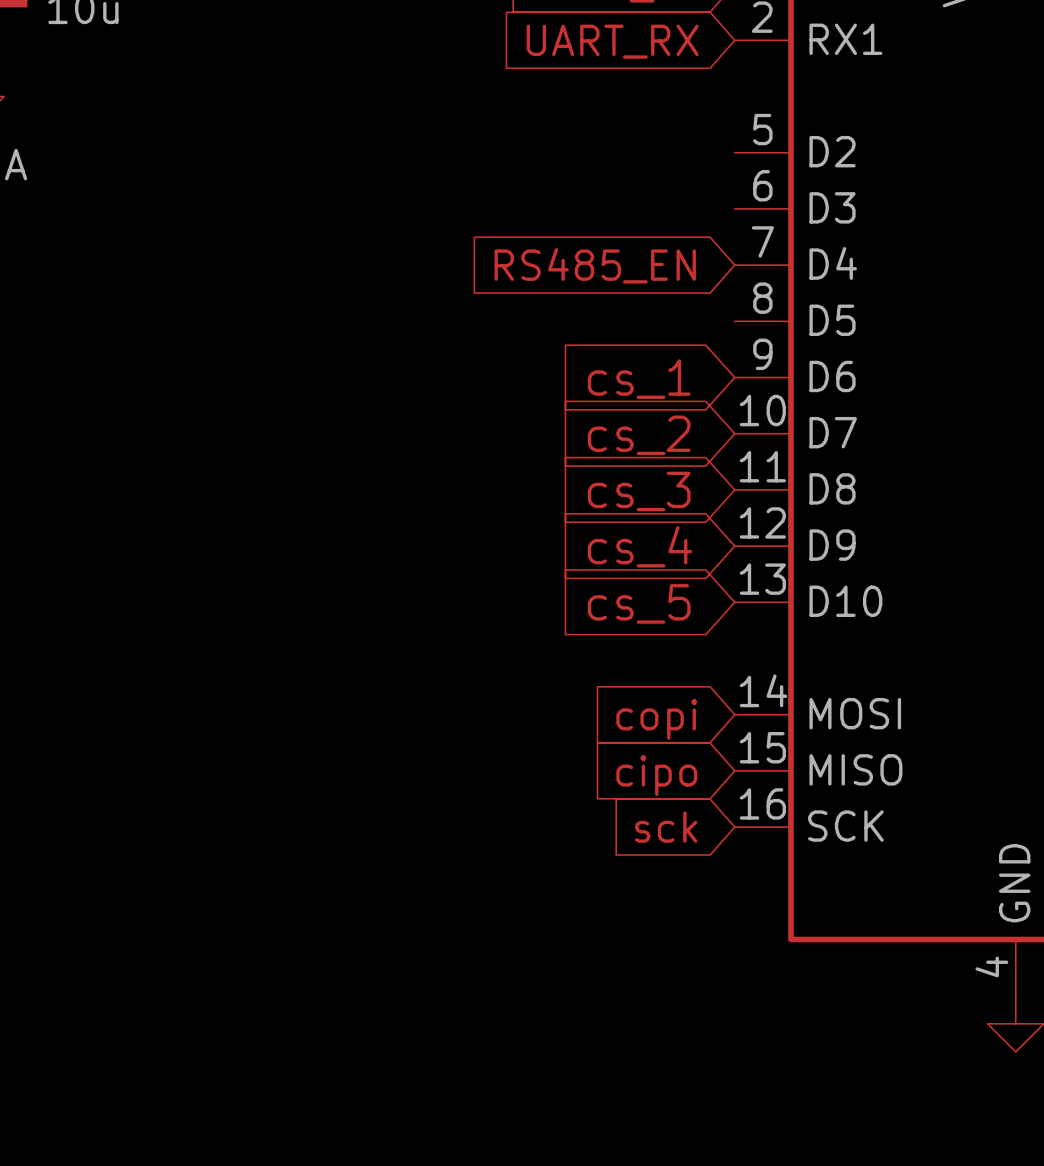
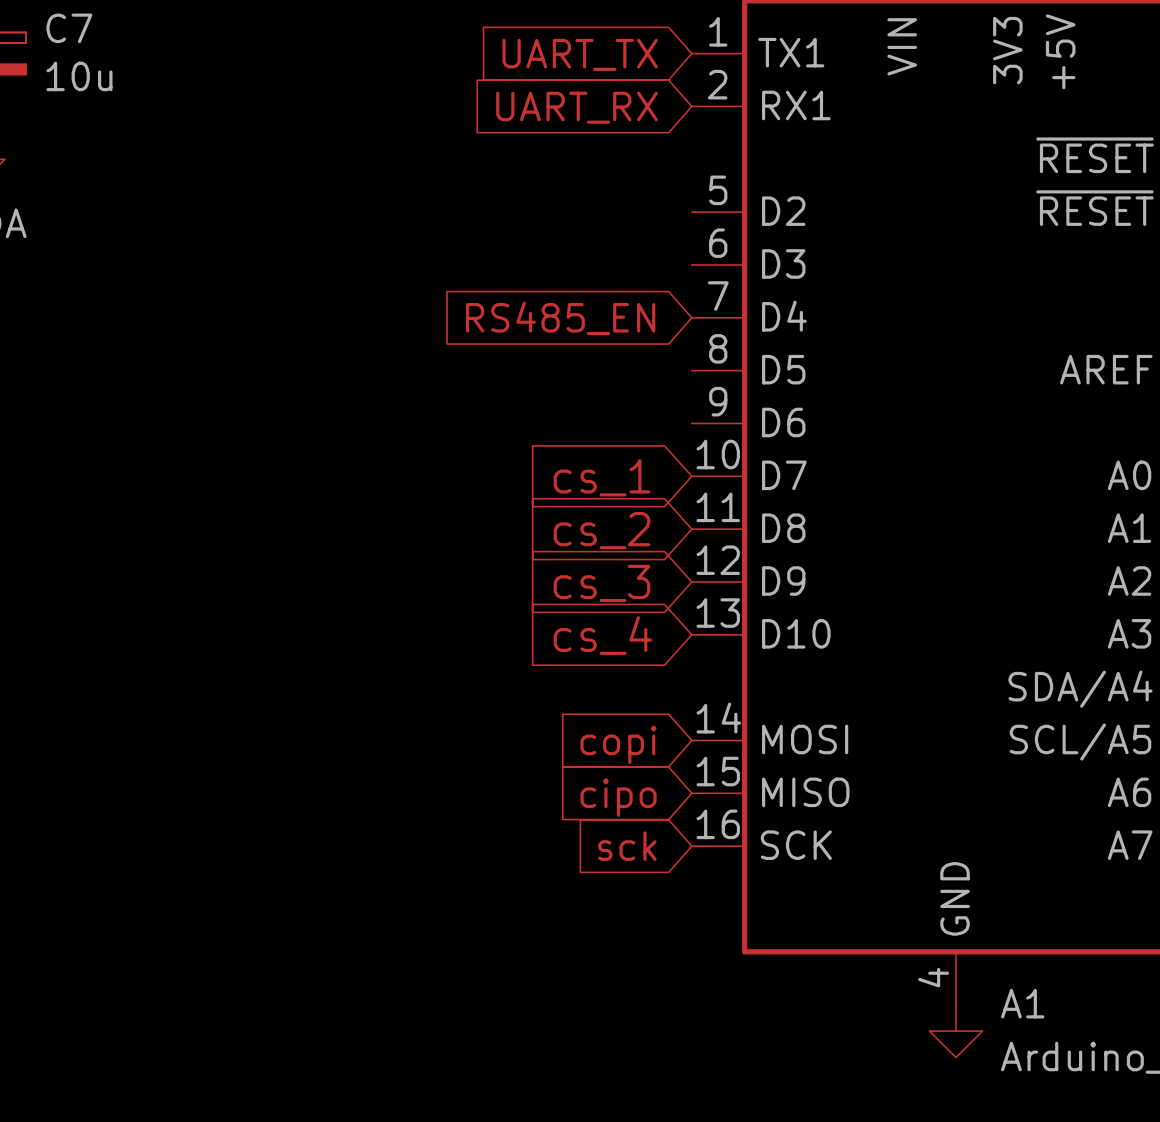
global label: cs_1 (639, 379) -> none
global label: cs_2 (639, 435) -> cs_1 (601, 477)
global label: cs_3 (639, 491) -> cs_2 (601, 530)
global label: cs_4 (639, 546) -> cs_3 (601, 583)
global label: cs_5 (639, 603) -> cs_4 (602, 635)

